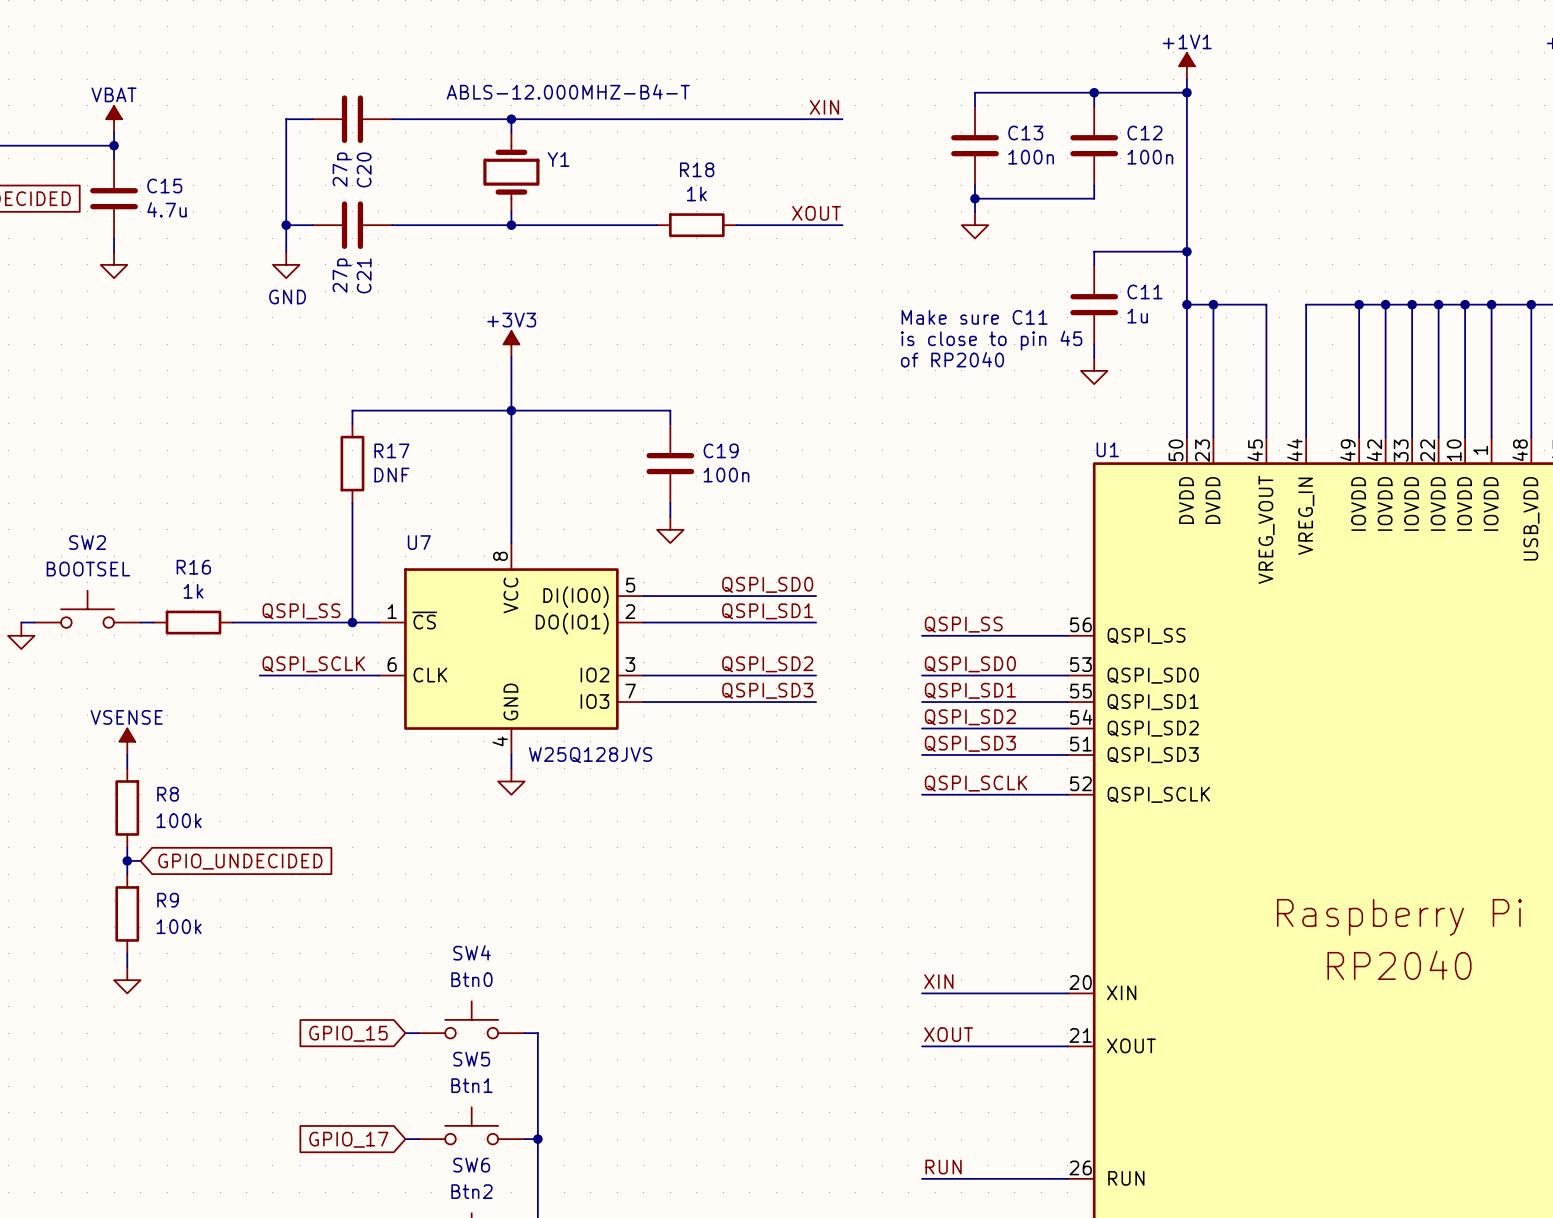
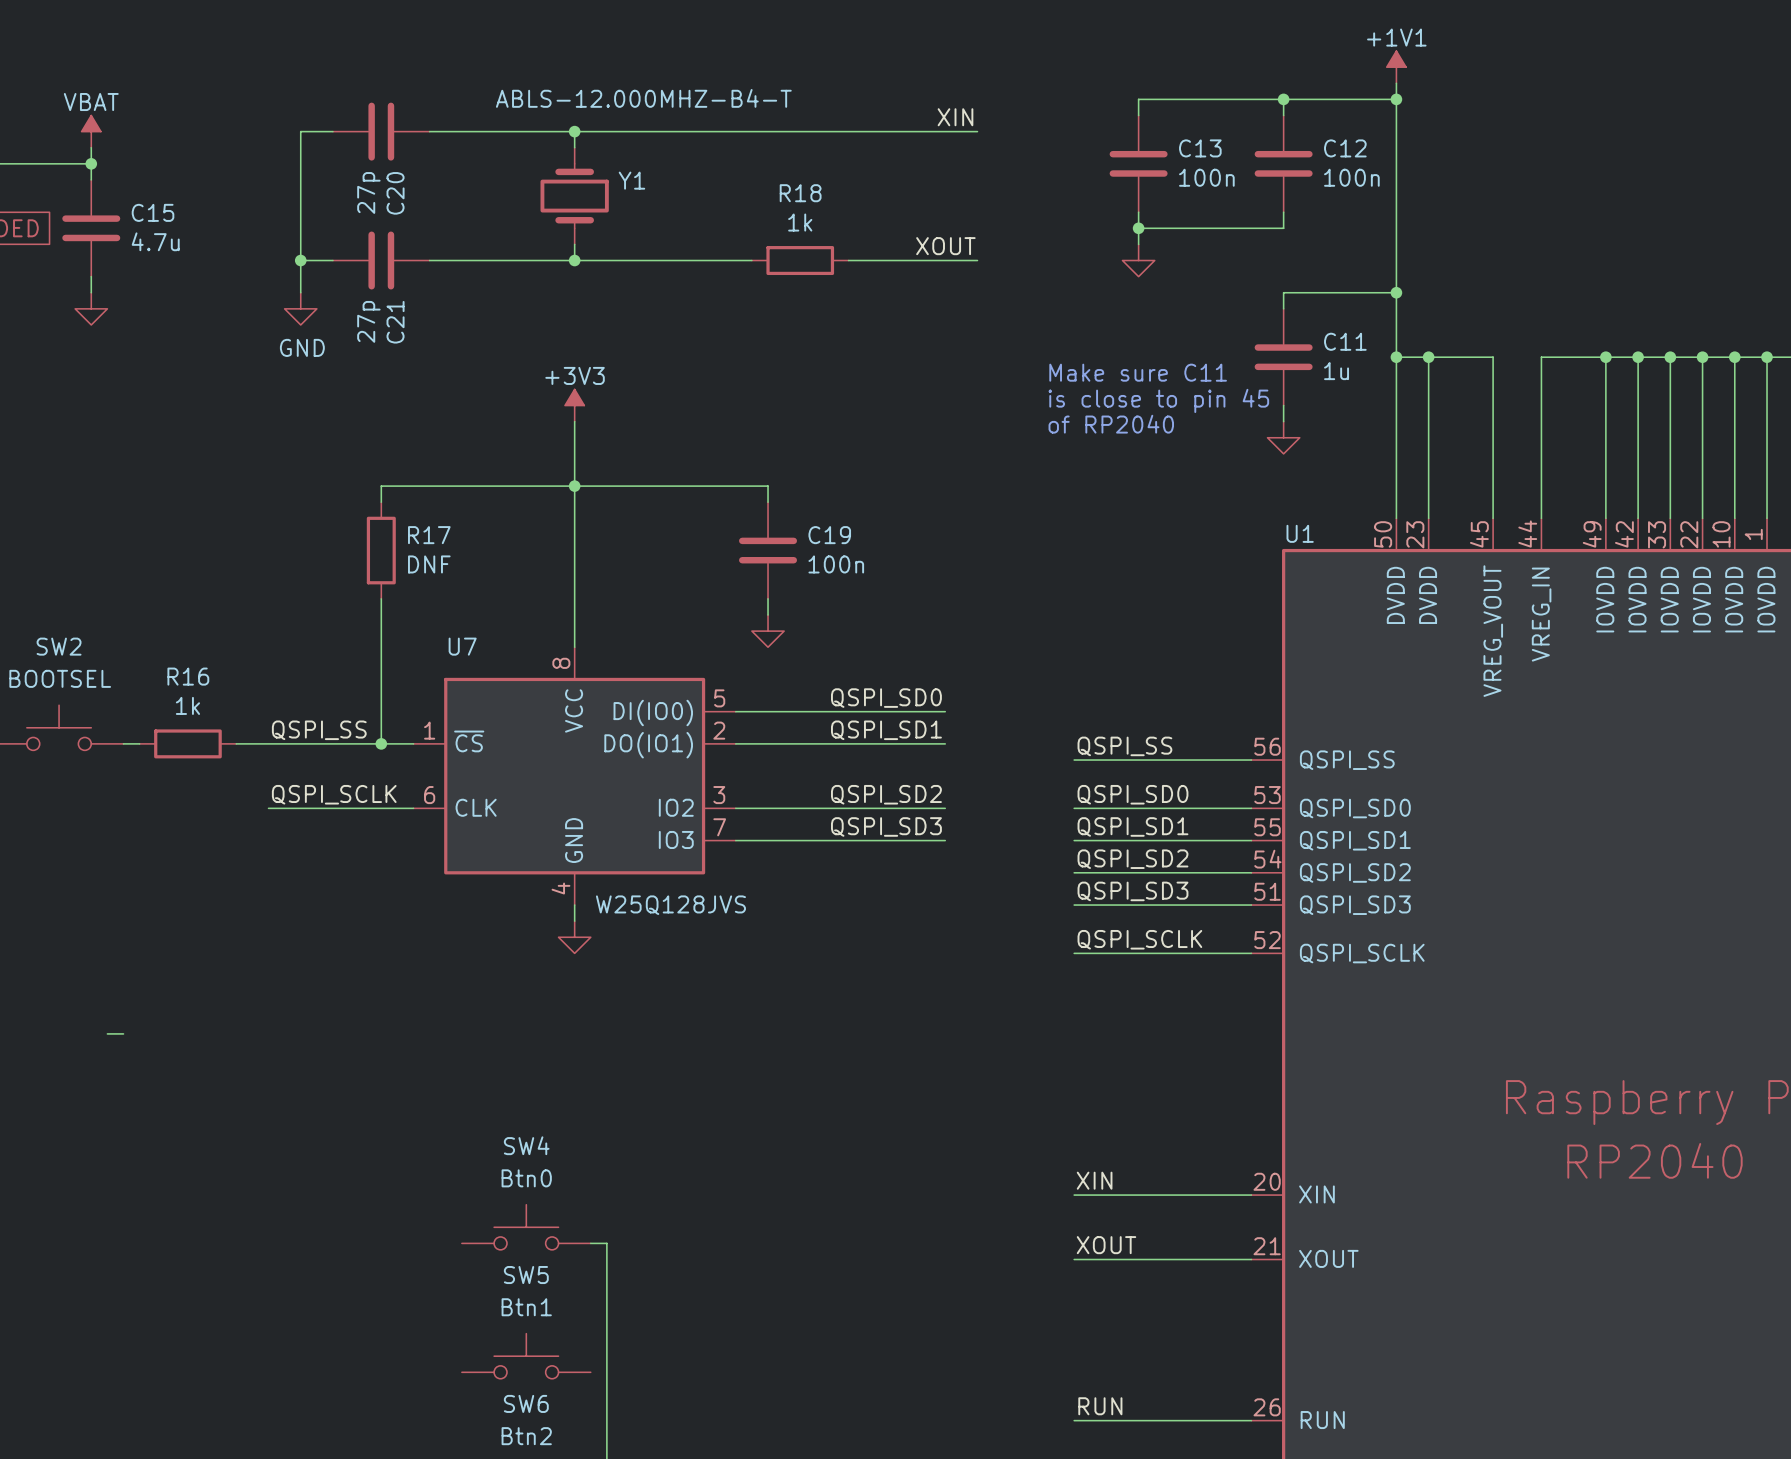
power symbol: VSENSE (127, 741) -> none
wire: (127, 755) (127, 768) -> none
R8: 100k (127, 807) -> none
wire: (127, 847) (127, 874) -> none
junction: (127, 860) -> none
global label: GPIO_UNDECIDED (240, 861) -> none
R9: 100k (127, 913) -> none
wire: (127, 953) (127, 966) -> none
power symbol: (127, 980) -> none
global label: GPIO_15 (348, 1033) -> none
wire: (405, 1033) (418, 1033) -> none
global label: GPIO_17 (348, 1139) -> none
wire: (405, 1139) (418, 1139) -> none
wire: (524, 1139) (537, 1139) -> none
junction: (537, 1139) -> none

